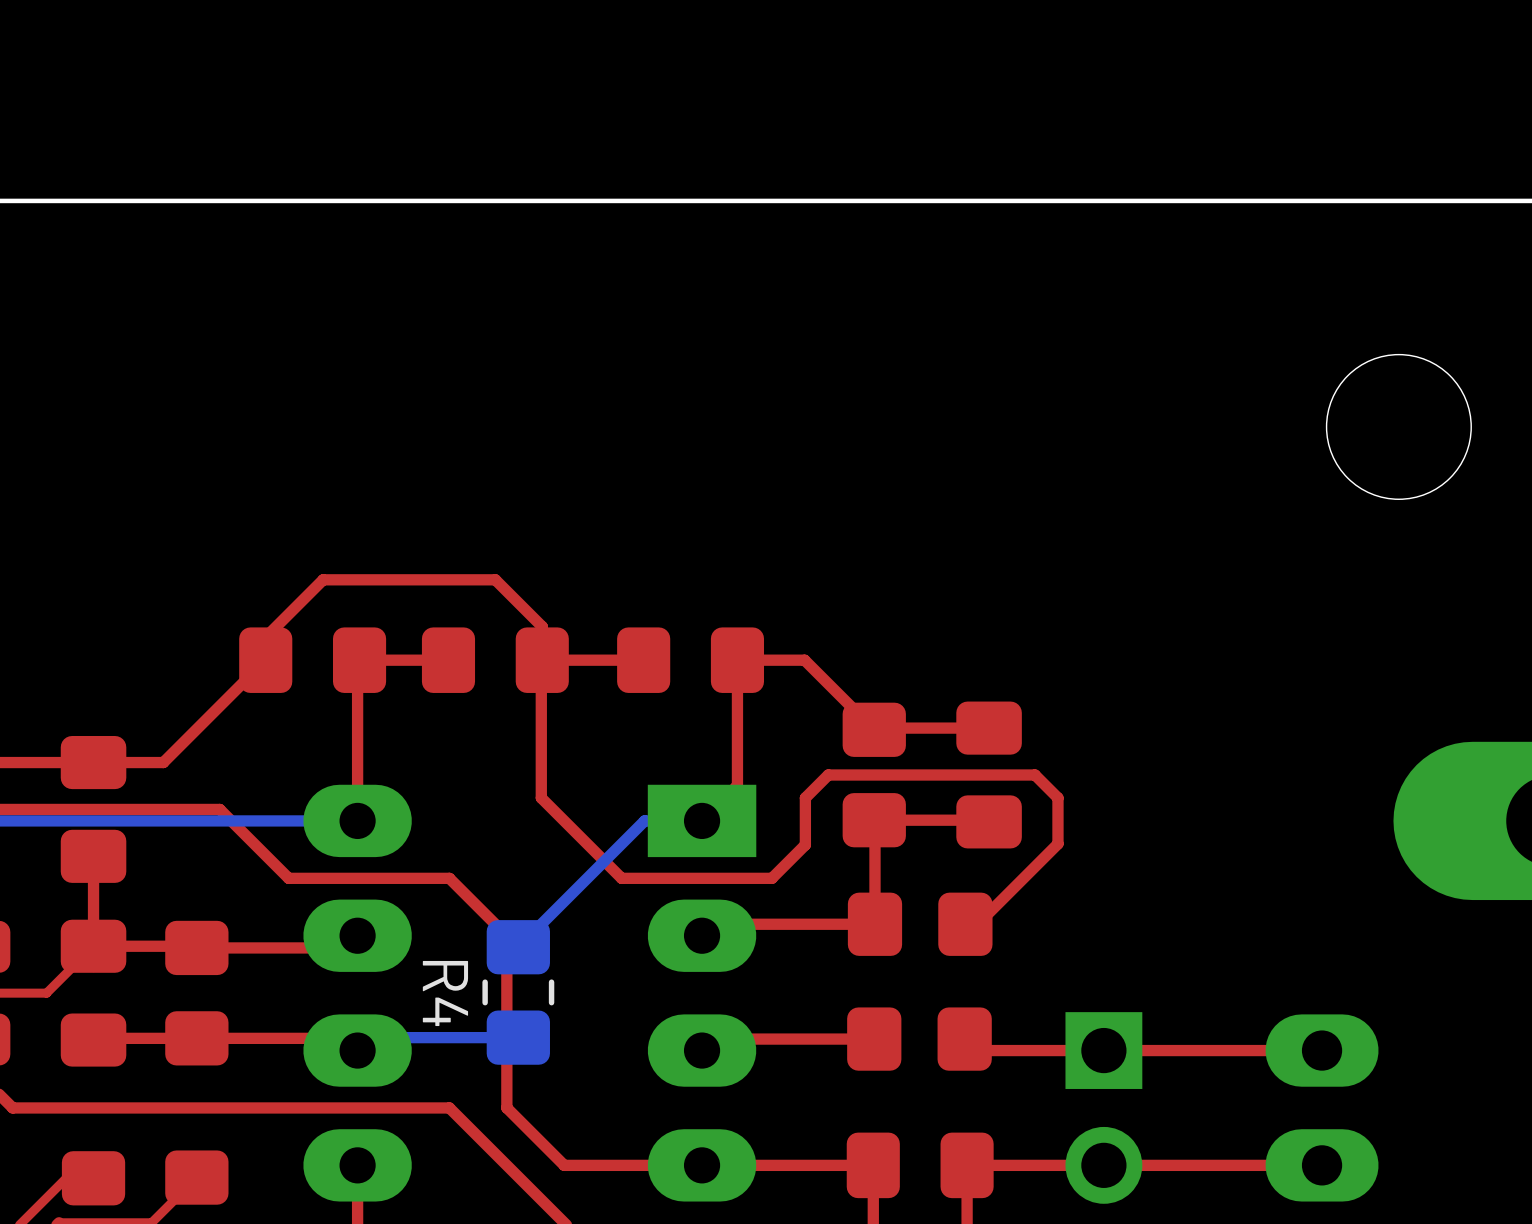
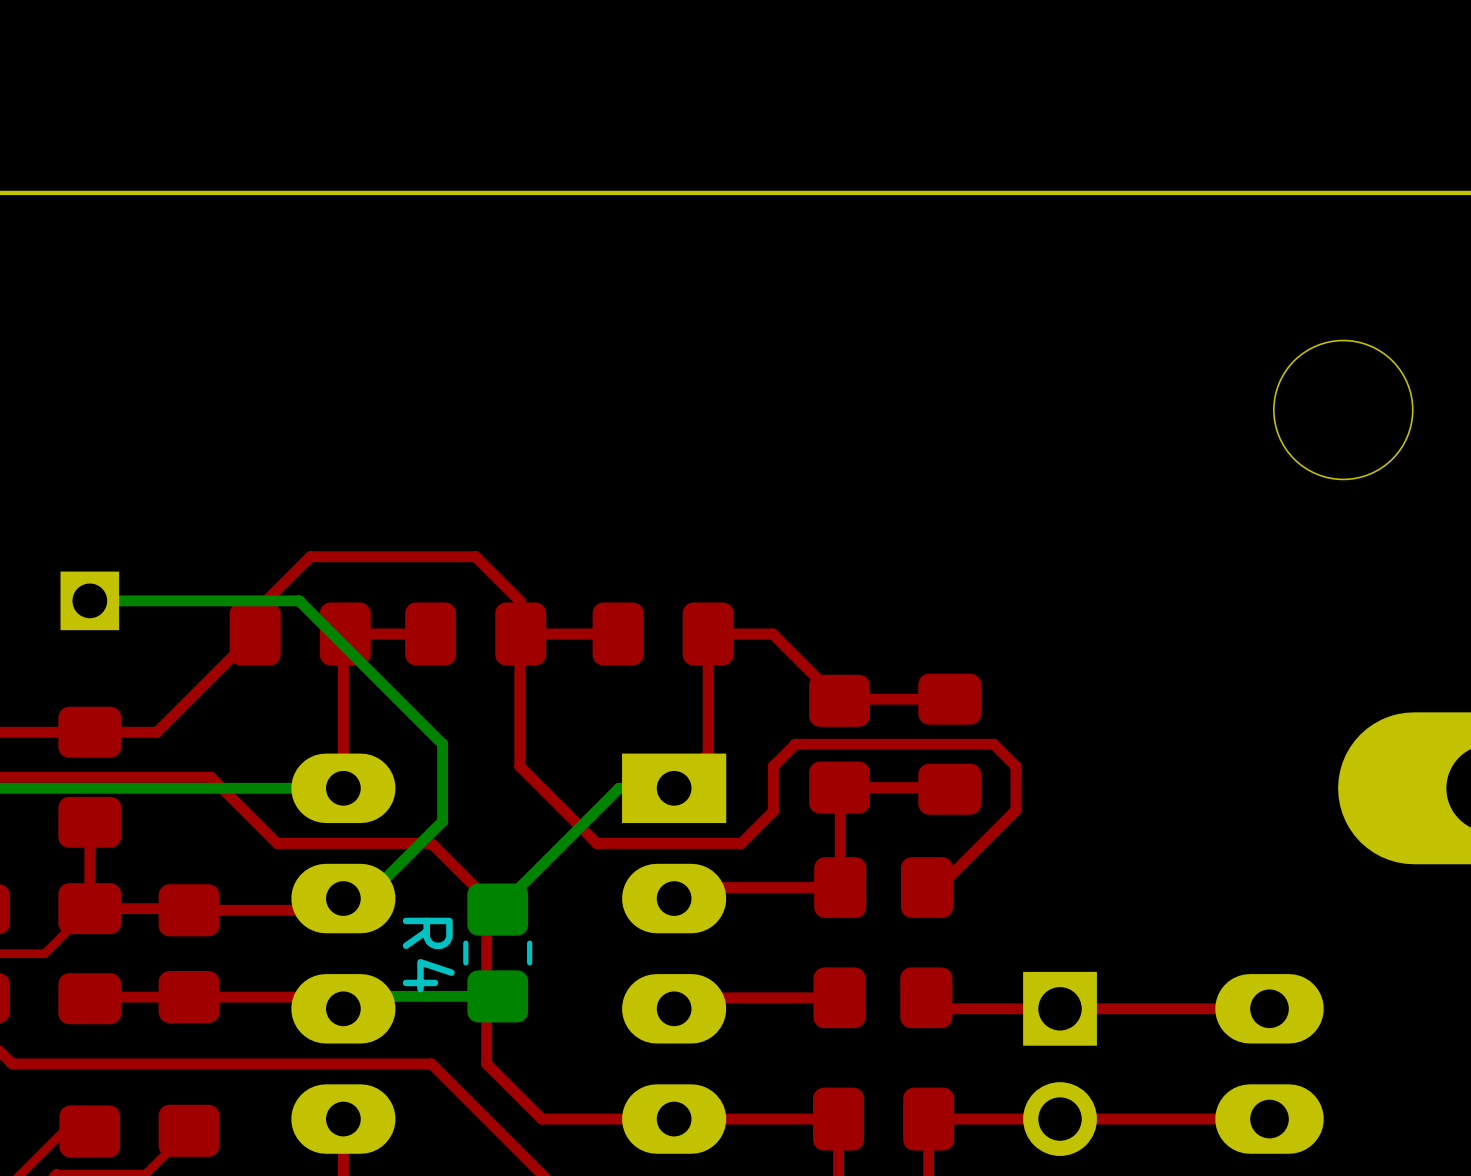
bottom track: none -> (89, 600) (299, 600) (442, 744) (442, 821) (365, 898) (343, 898)
part: none -> (89, 600)

